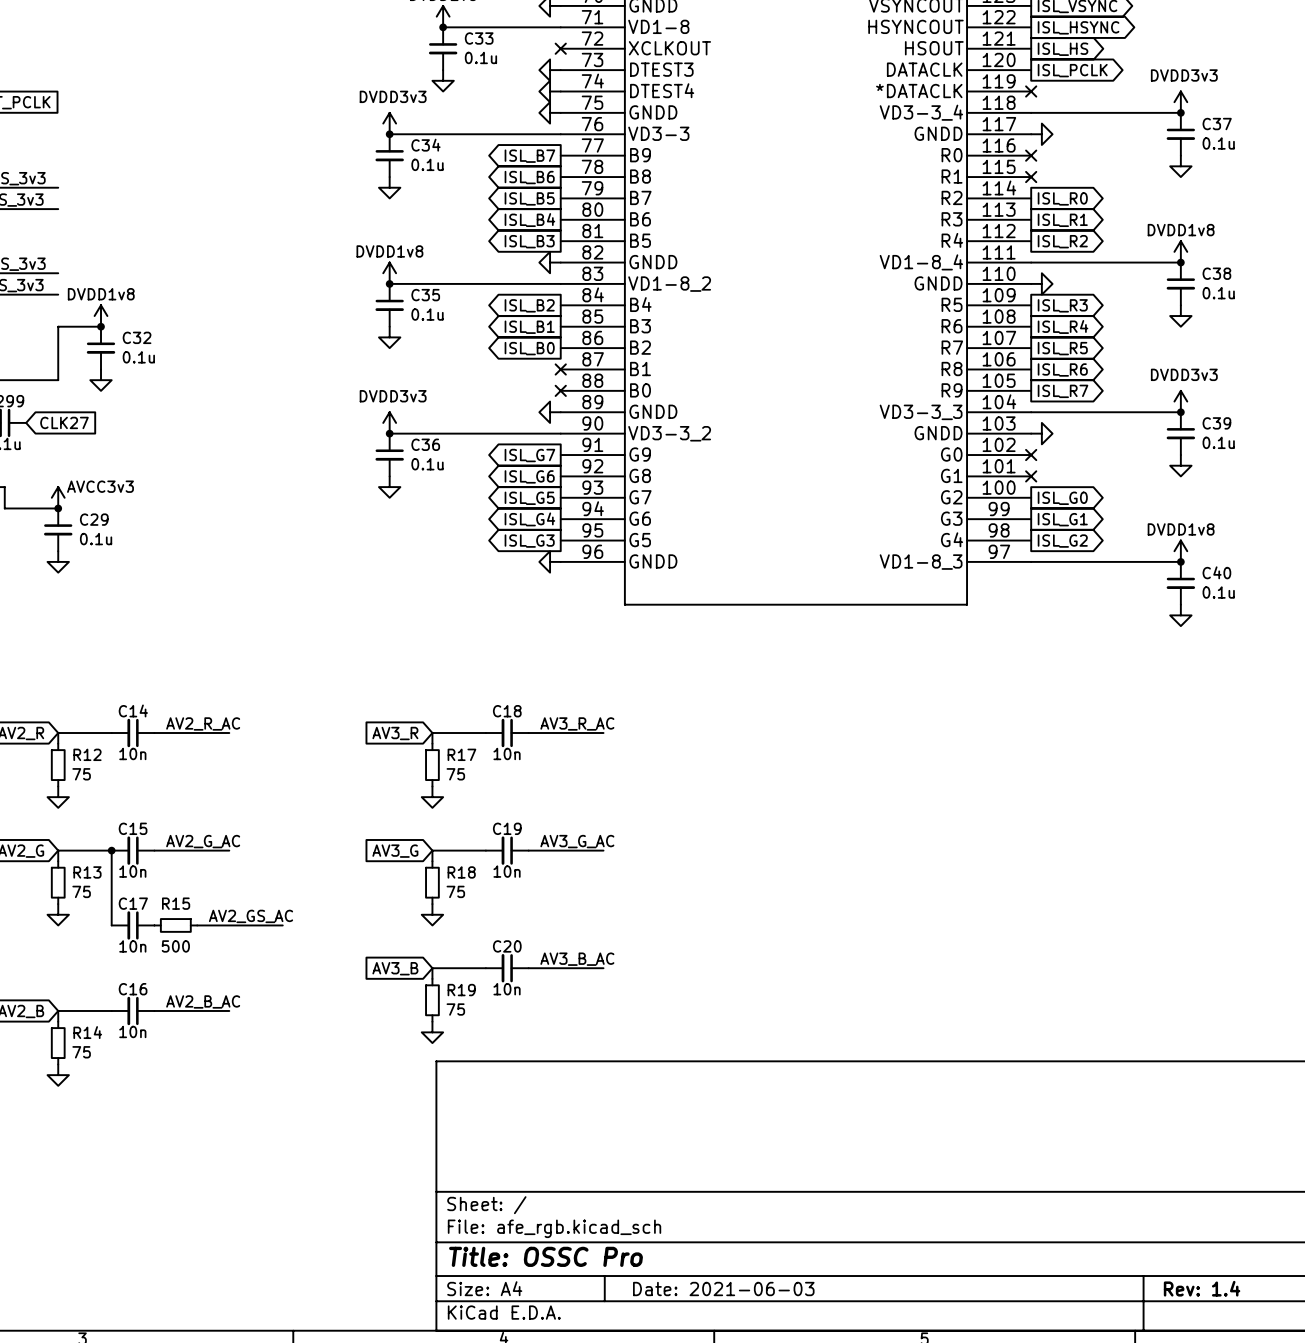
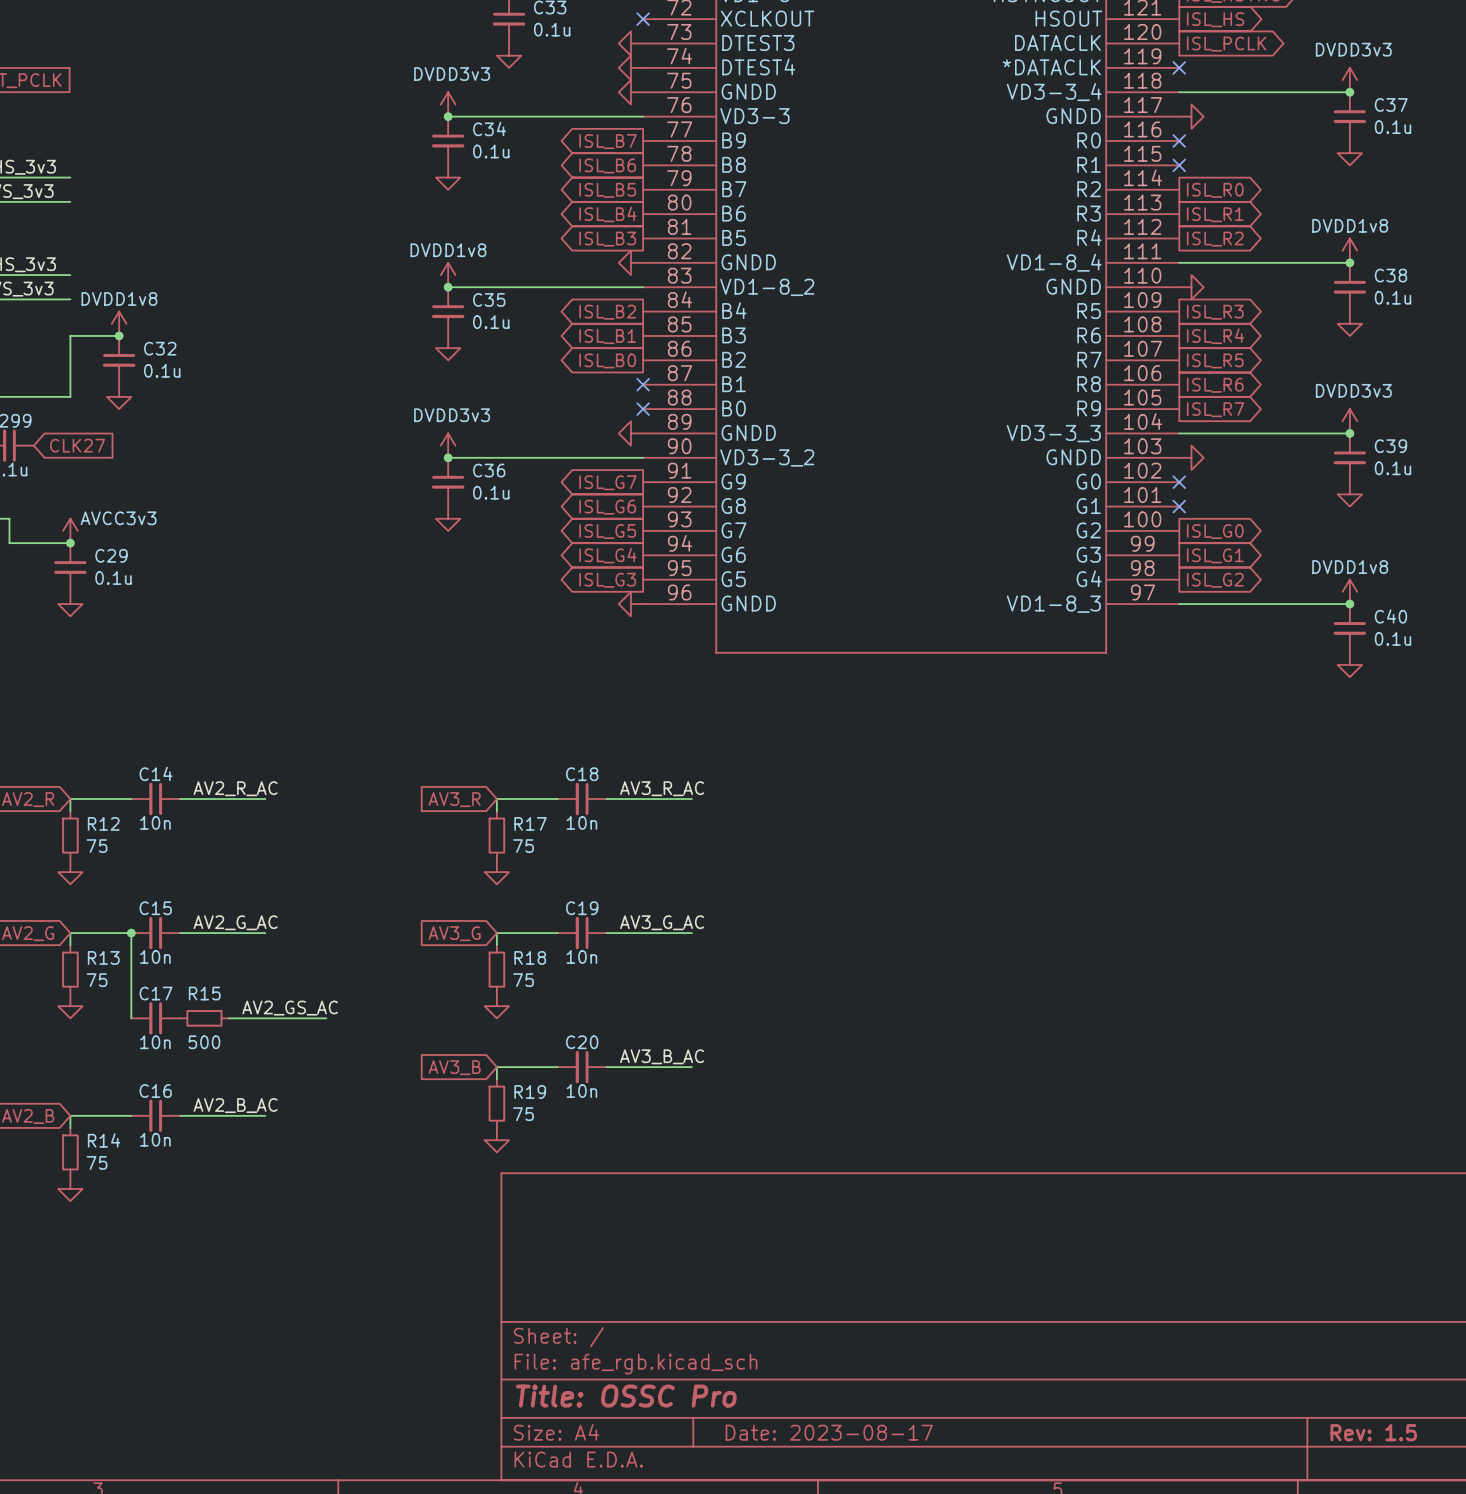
title block: Rev: 1.4 (1202, 1288) -> Rev: 1.5 (1373, 1432)
title block: Date: 2021-06-03 (723, 1289) -> Date: 2023-08-17 (829, 1432)

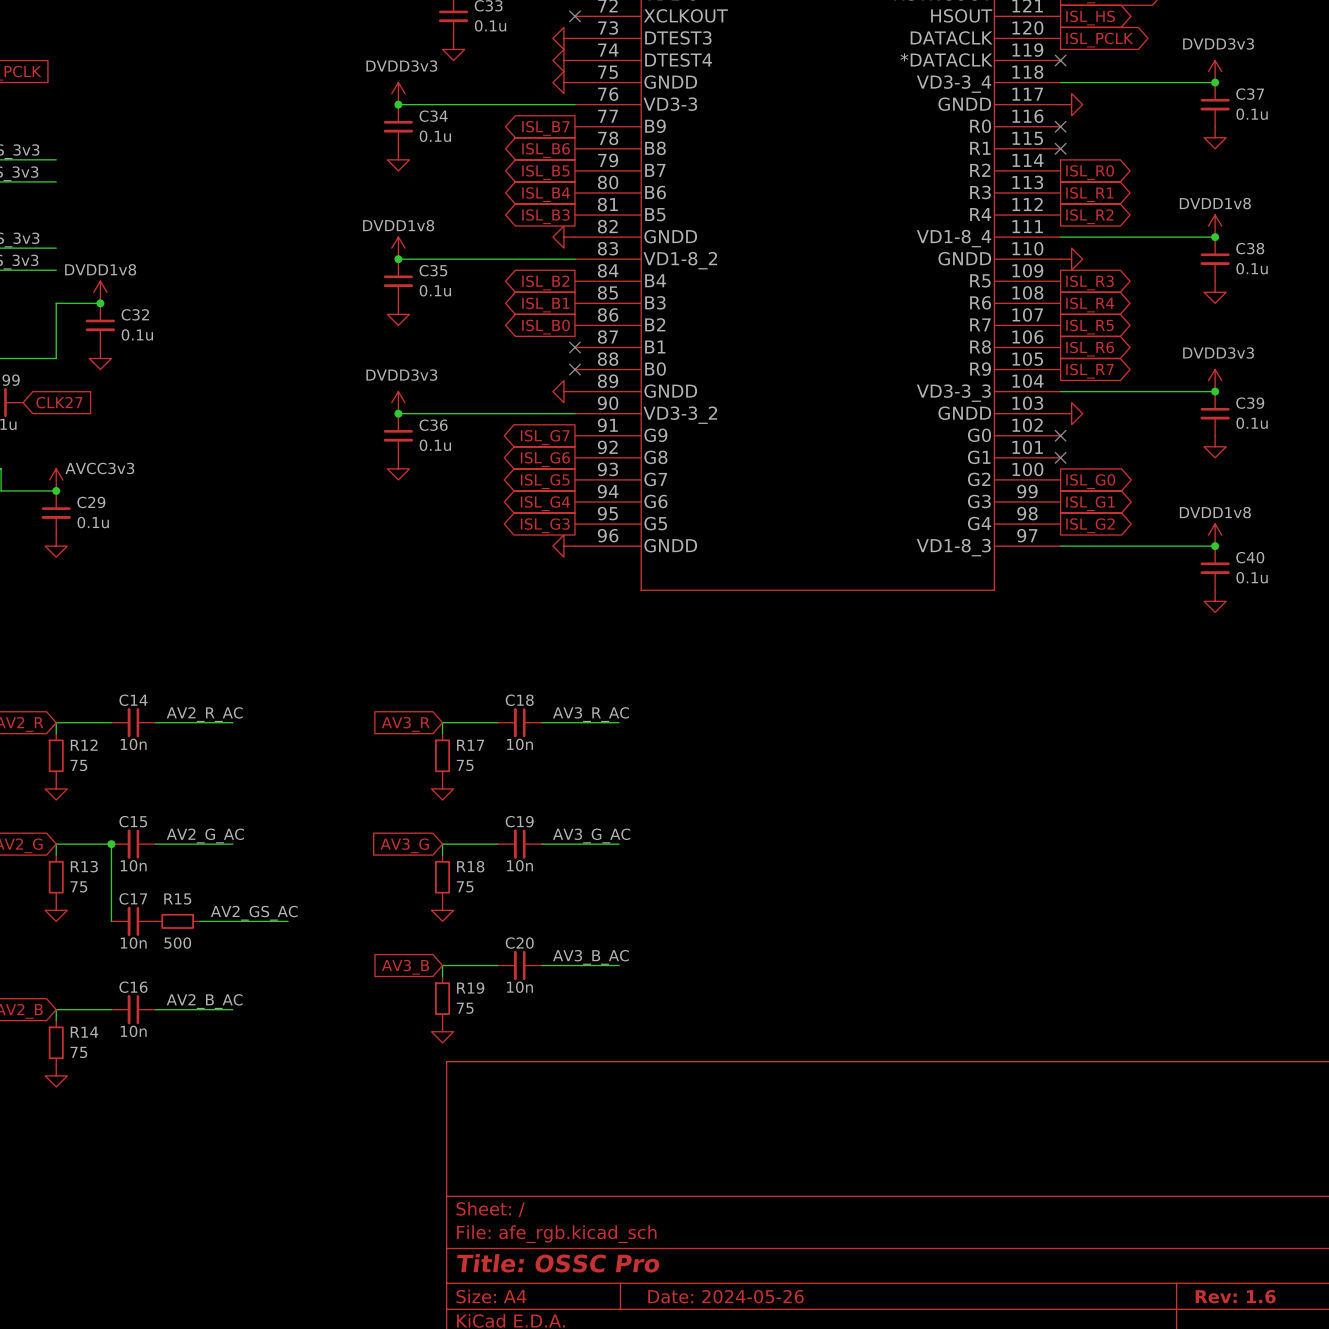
title block: Date: 2023-08-17 (829, 1432) -> Date: 2024-05-26 (726, 1296)
title block: Rev: 1.5 (1373, 1432) -> Rev: 1.6 (1235, 1296)

